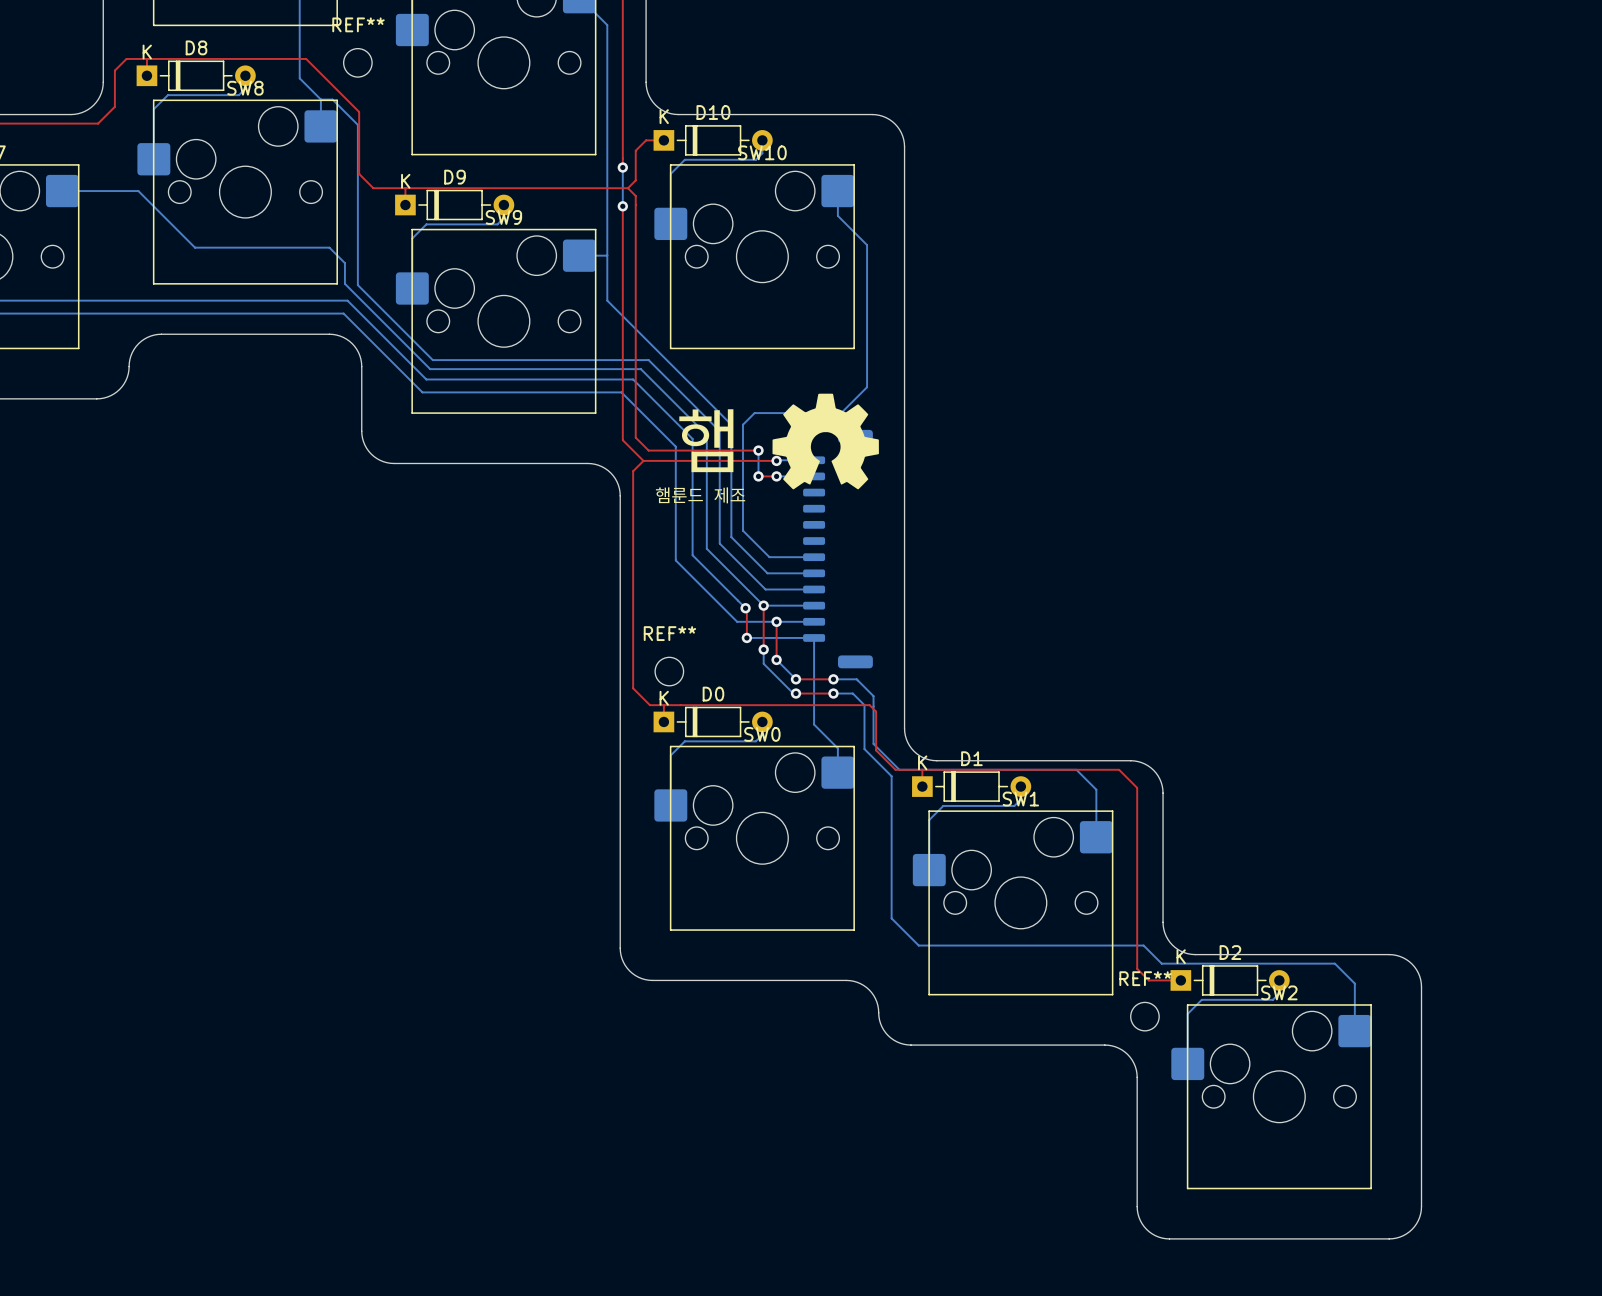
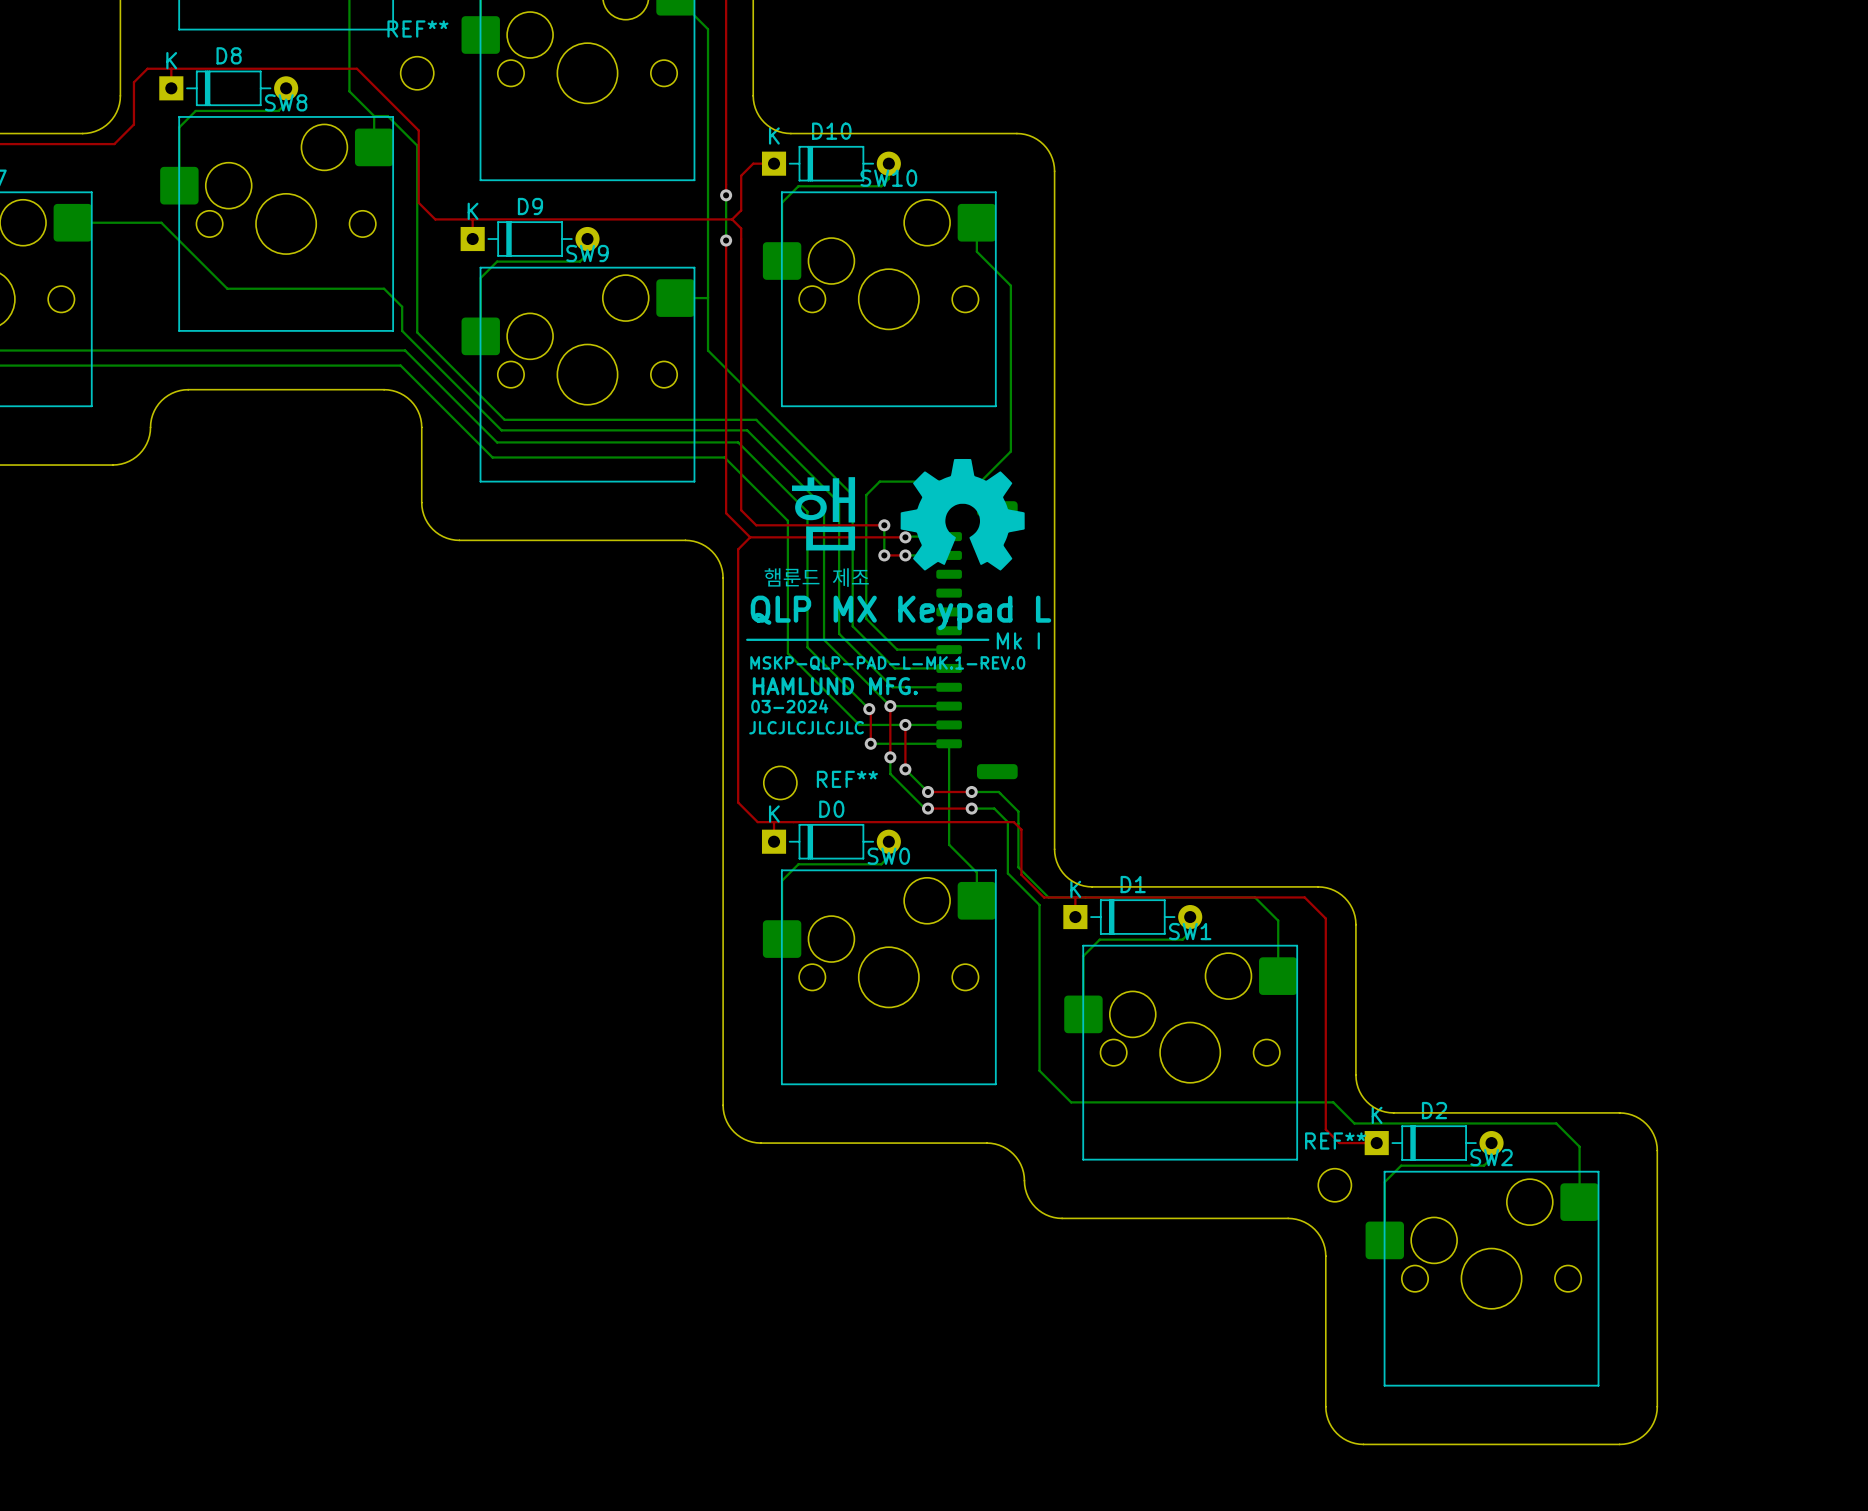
text: none -> QLP MX Keypad L (900, 612)
line: none -> (747, 639) (988, 639)
text: none -> Mk I (1018, 640)
text: none -> MSKP-QLP-PAD-L-MK.1-REV.0 (887, 663)
text: none -> HAMLUND MFG. (835, 686)
text: none -> 03-2024 (789, 706)
text: none -> JLCJLCJLCJLC (806, 727)
REF** name position: REF** (669, 633) -> REF** (847, 779)

